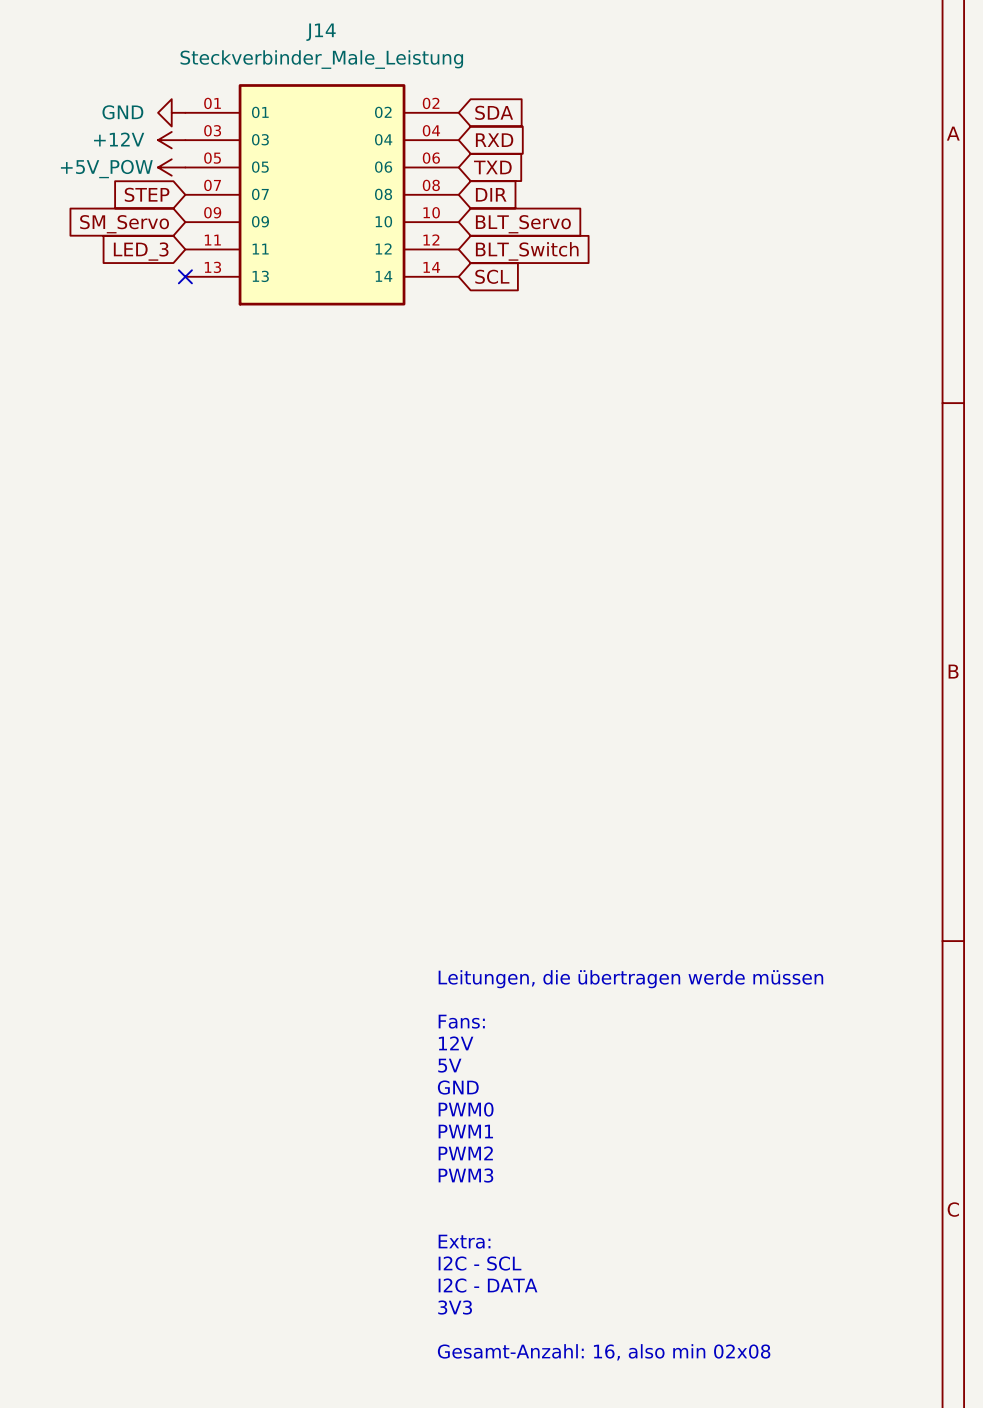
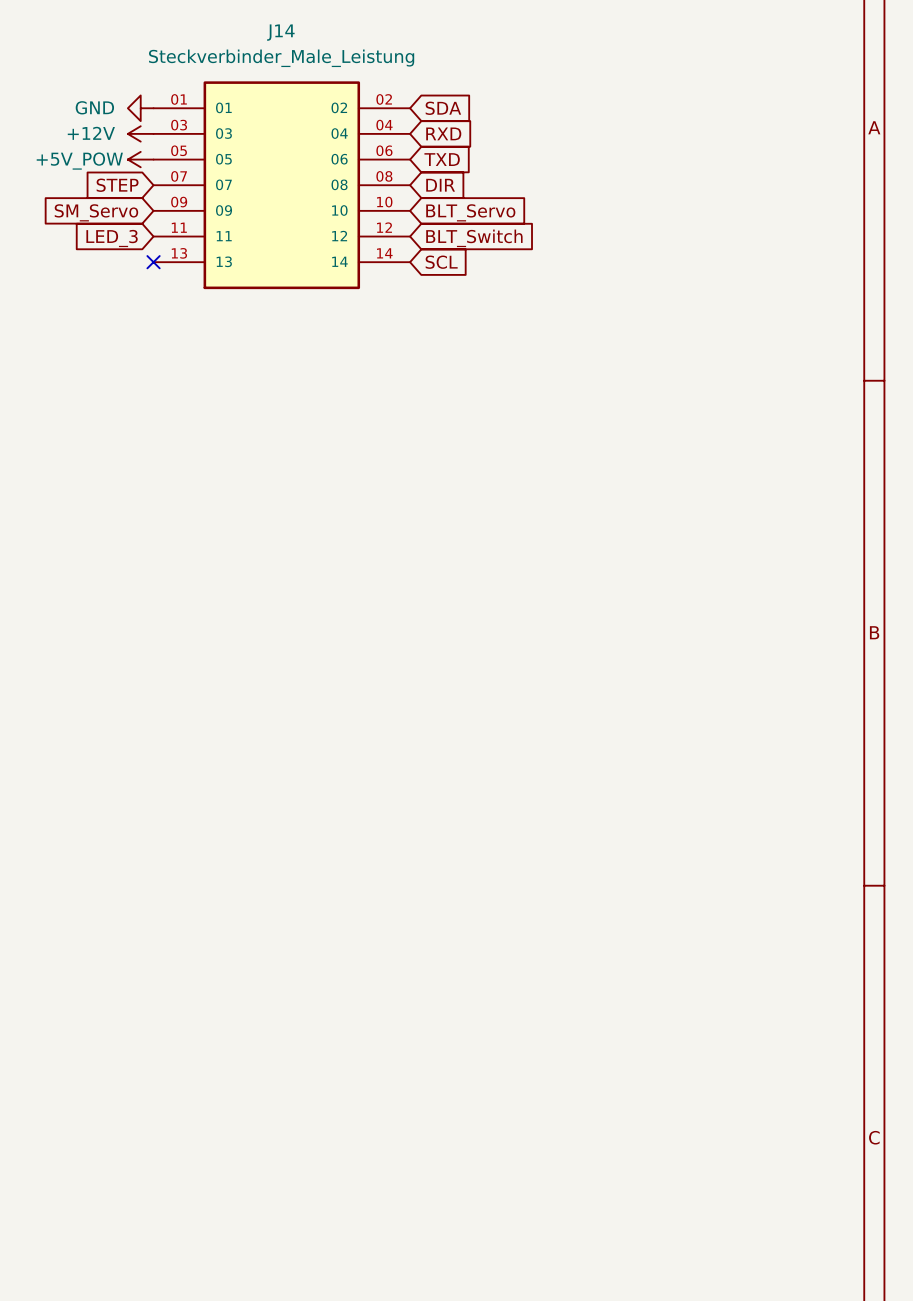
text: Leitungen, die übertragen werde müssen (630, 979) -> none
text: Fans: (461, 1021) -> none
text: 12V (456, 1043) -> none
text: 5V (449, 1065) -> none
text: GND (458, 1087) -> none
text: PWM0 (466, 1109) -> none
text: PWM1 (465, 1131) -> none
text: PWM2 (465, 1153) -> none
text: PWM3 (465, 1175) -> none
text: Extra: (464, 1241) -> none
text: I2C - SCL (480, 1263) -> none
text: I2C - DATA (488, 1285) -> none
text: 3V3 (455, 1307) -> none
text: Gesamt-Anzahl: 16, also min 02x08 (604, 1352) -> none

